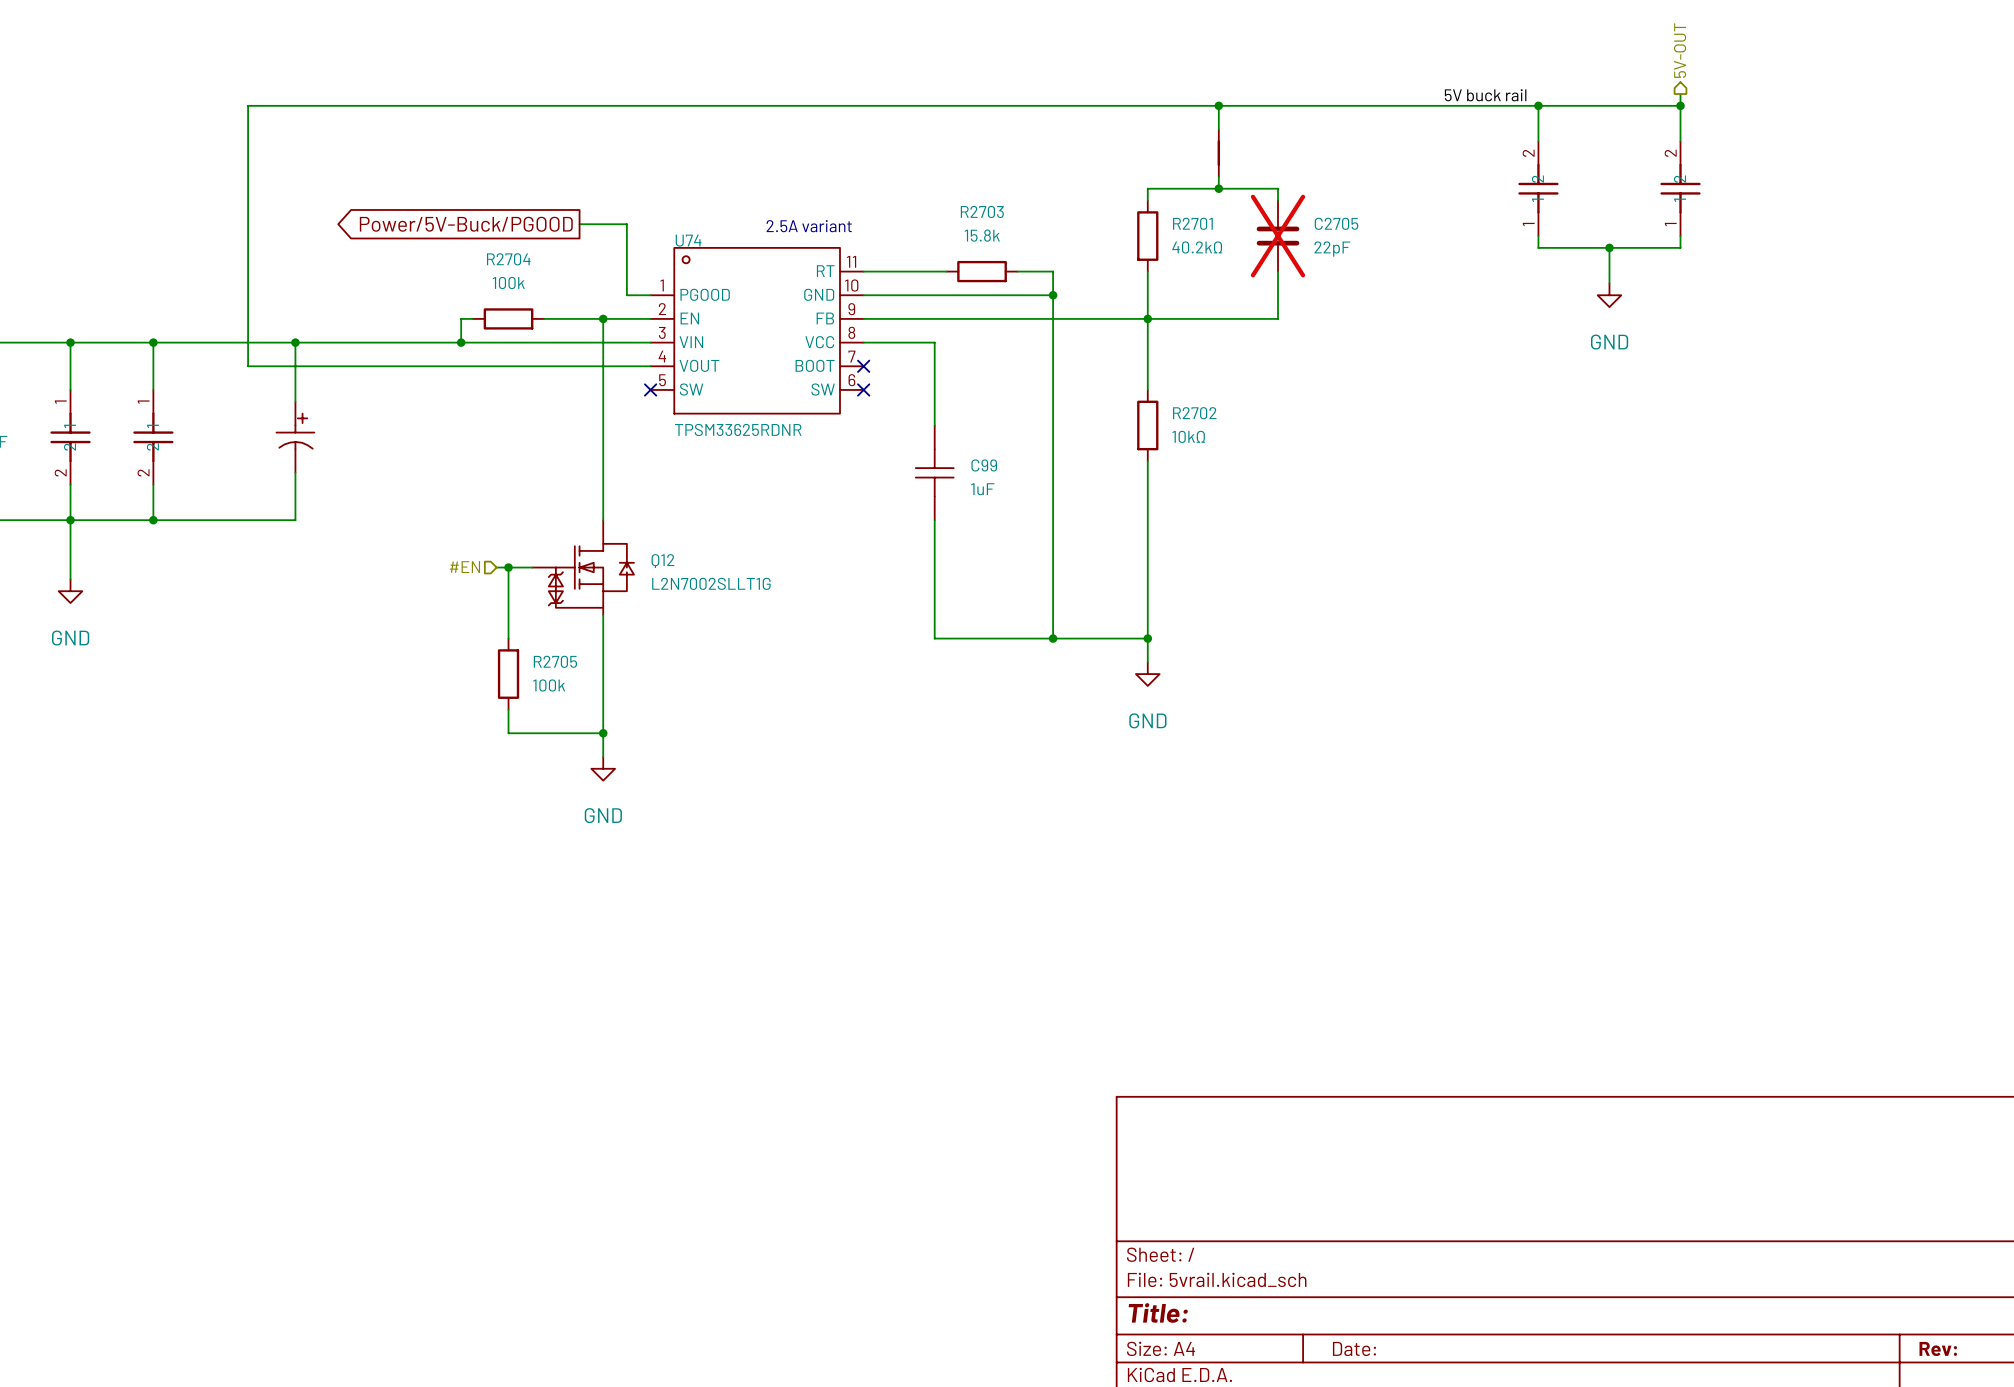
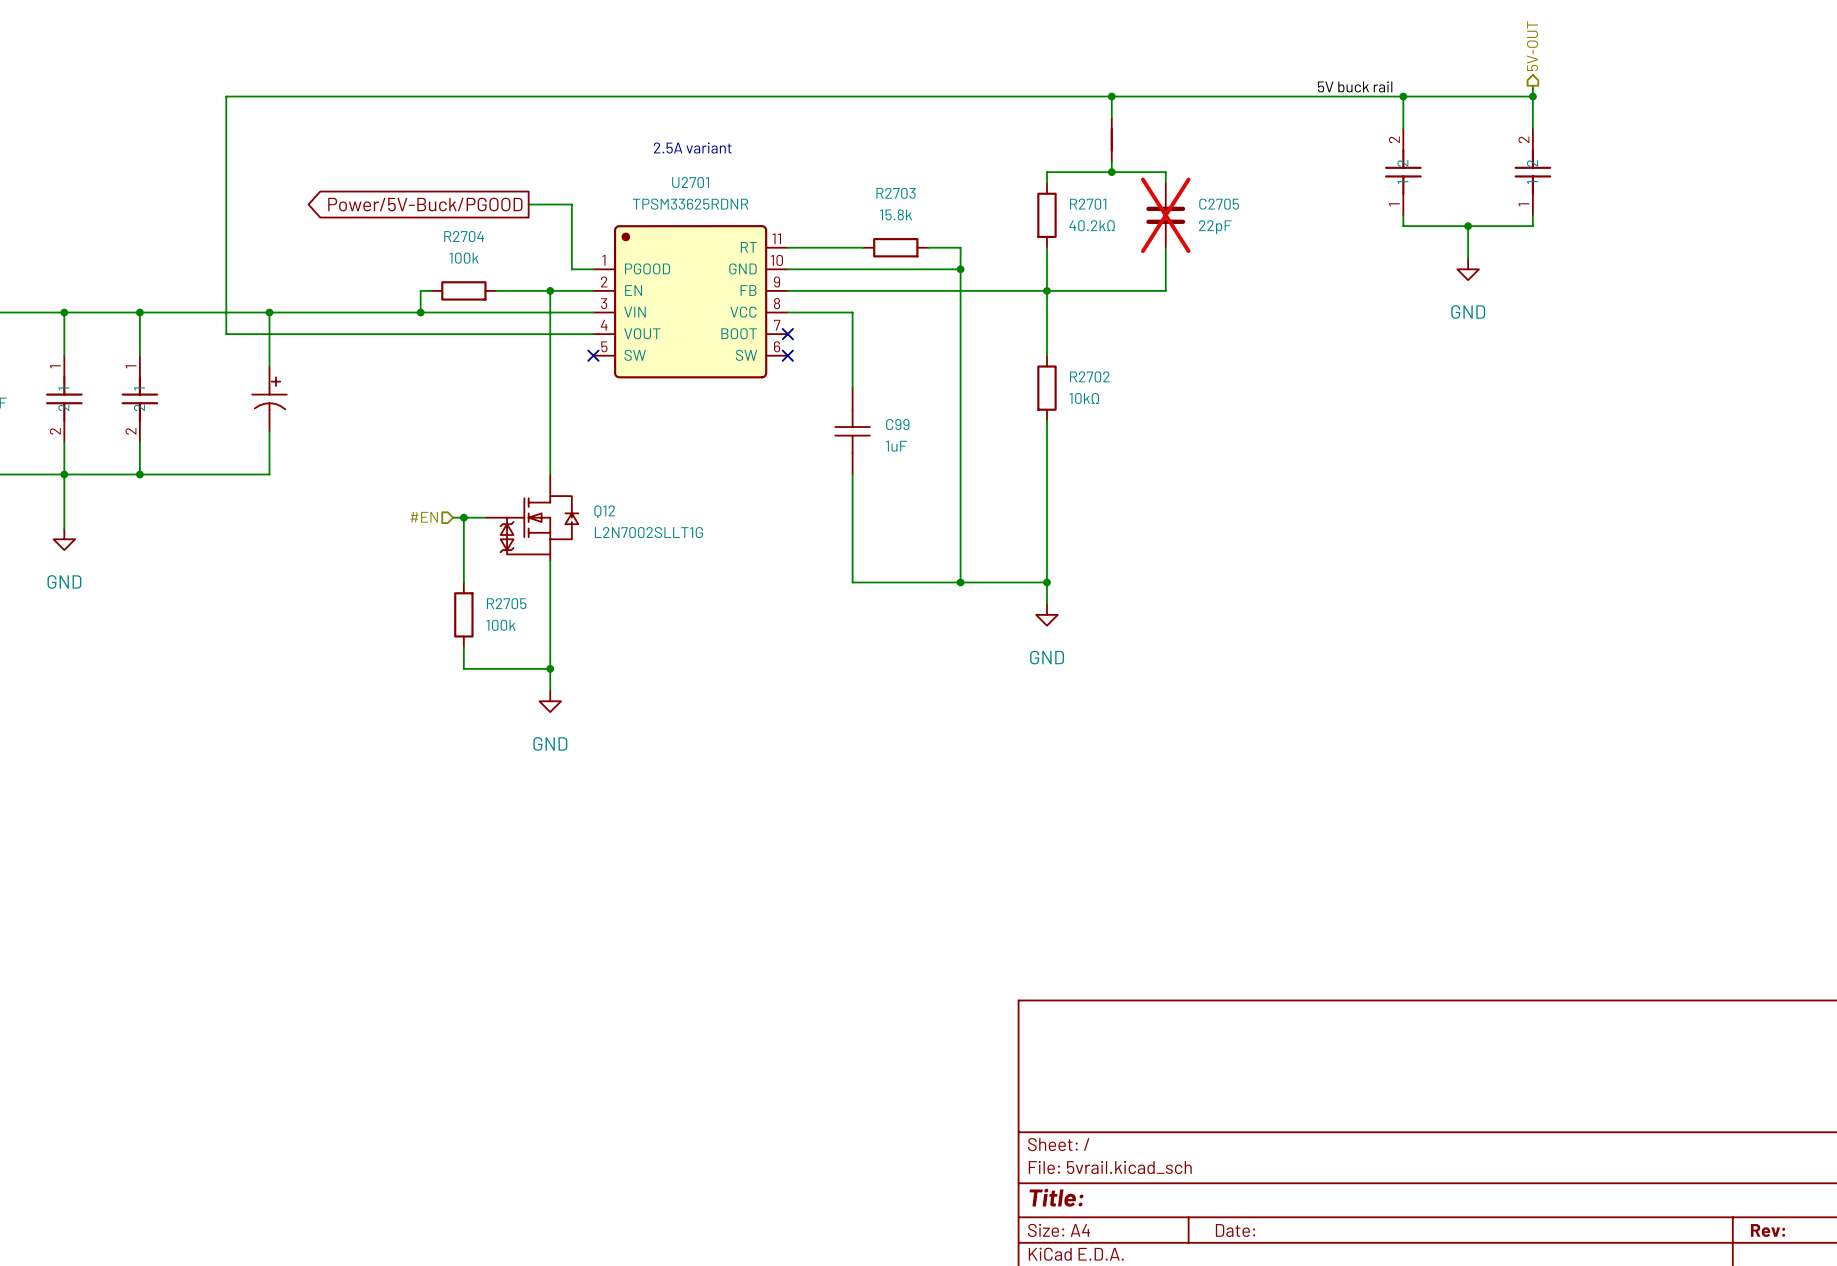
text position: 2.5A variant (809, 226) -> 2.5A variant (692, 148)
U74: TPSM33625RDNR (757, 330) -> none
U2701: none -> TPSM33625RDNR (690, 301)

